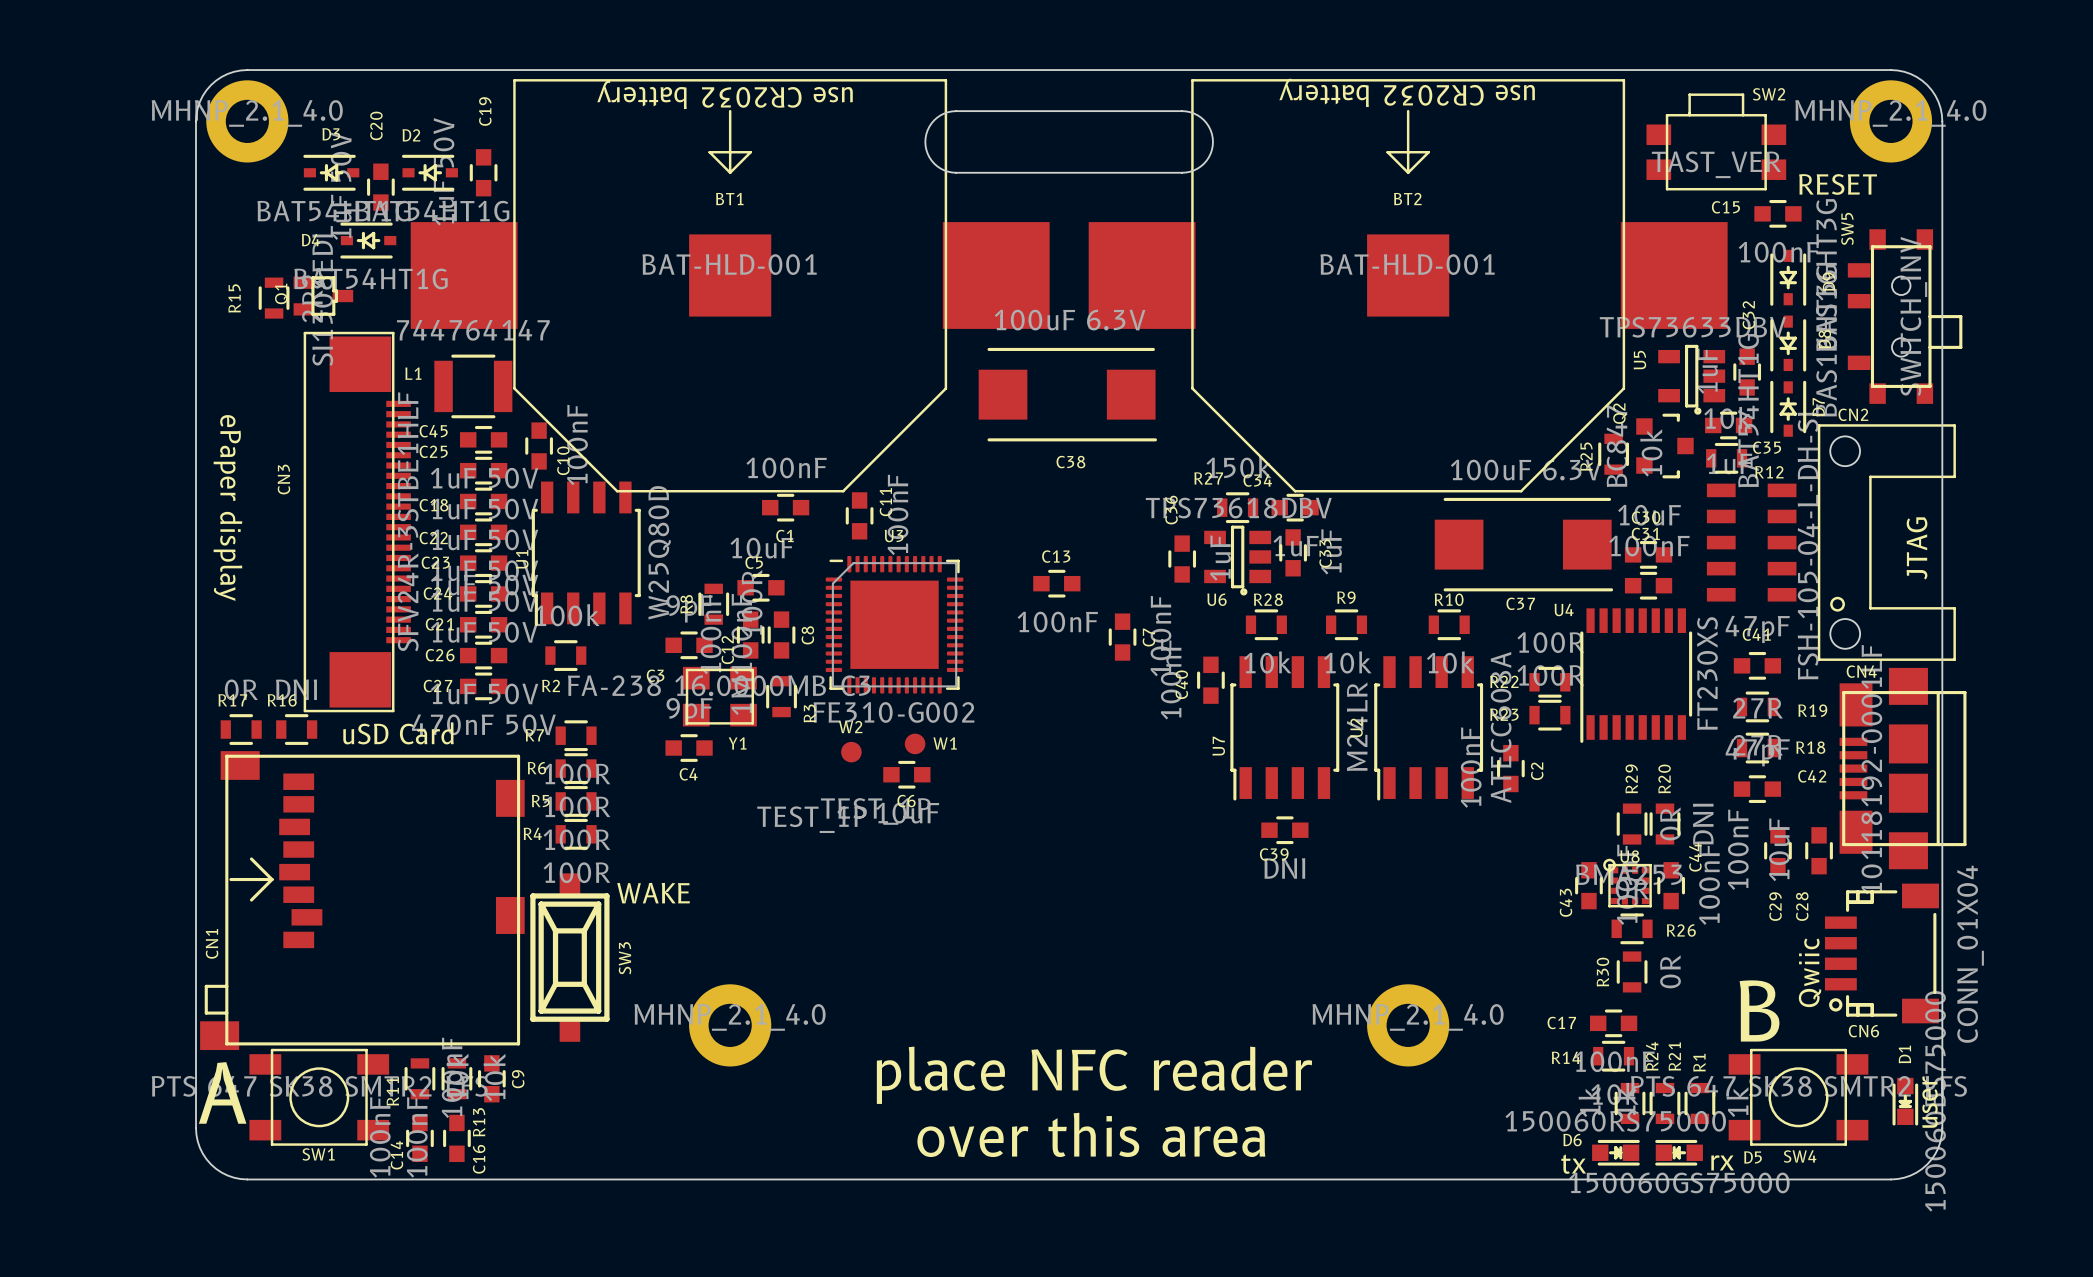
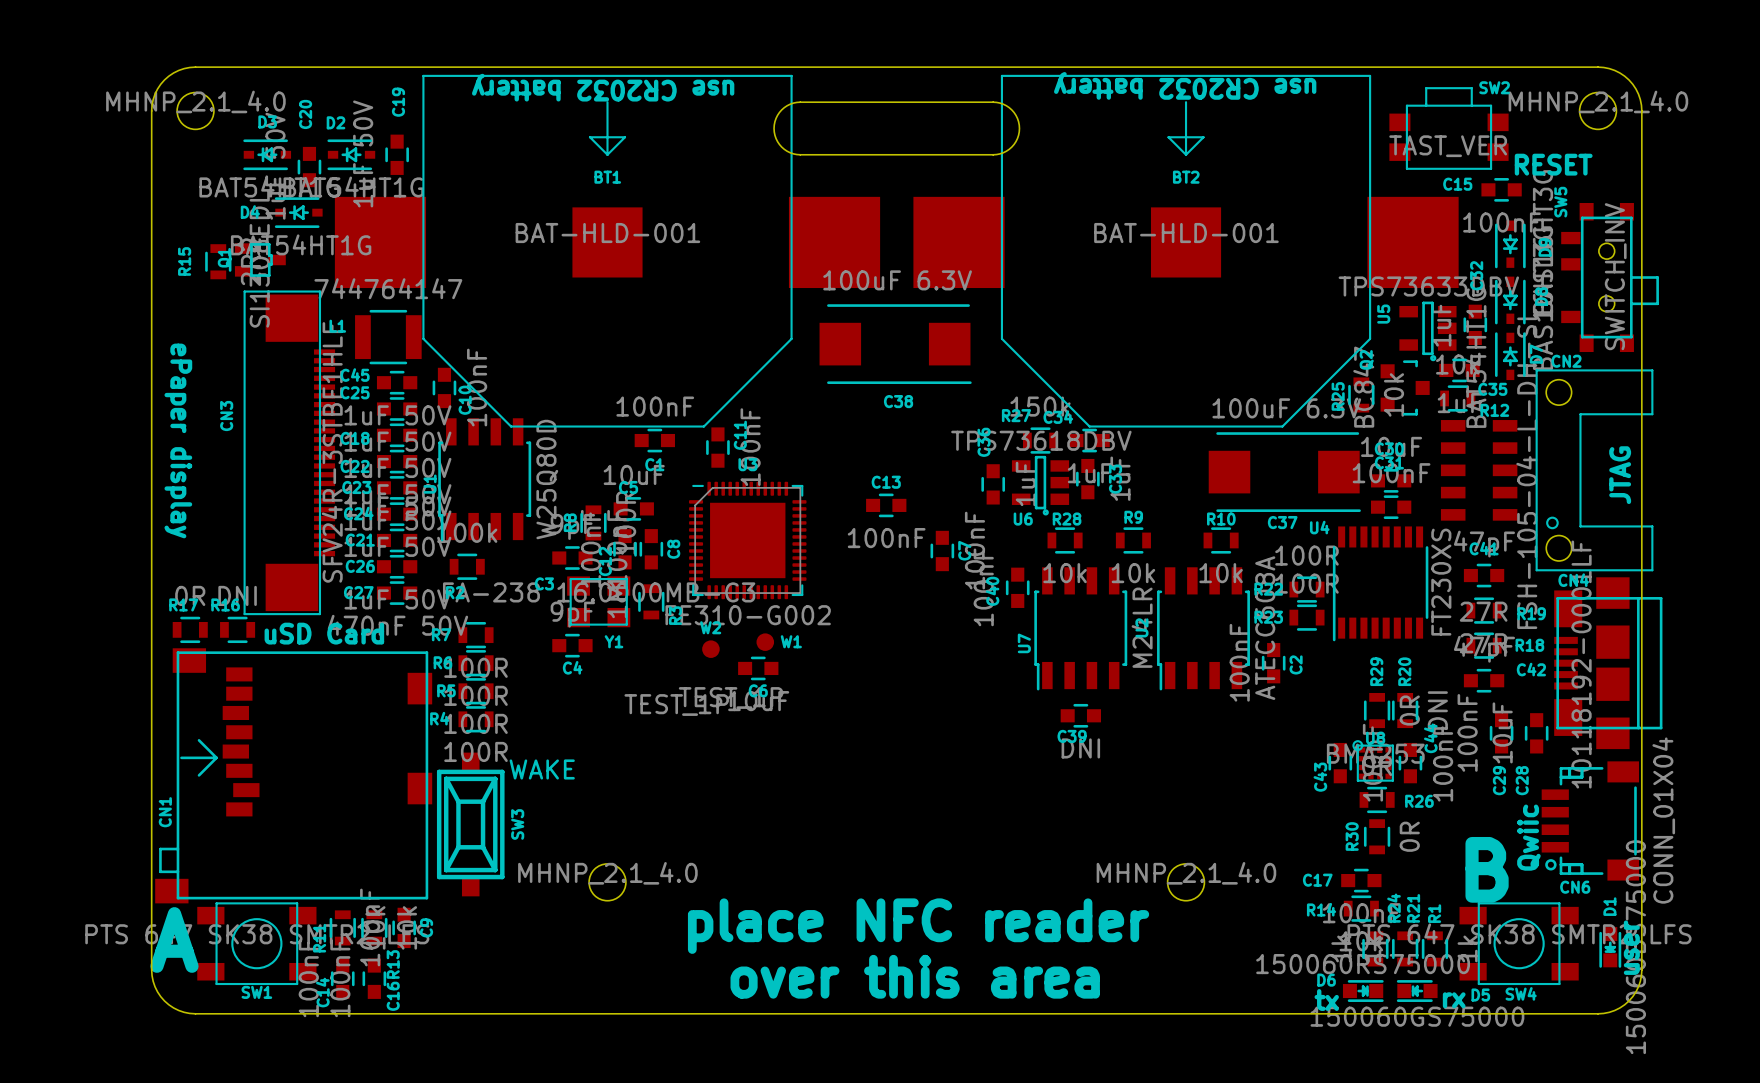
part footprint: [206, 80, 289, 163] -> [177, 92, 214, 130]
part footprint: [1849, 80, 1933, 163] -> [1579, 92, 1617, 130]
part footprint: [689, 984, 772, 1067] -> [589, 863, 626, 901]
part footprint: [1367, 984, 1450, 1067] -> [1167, 863, 1205, 901]

